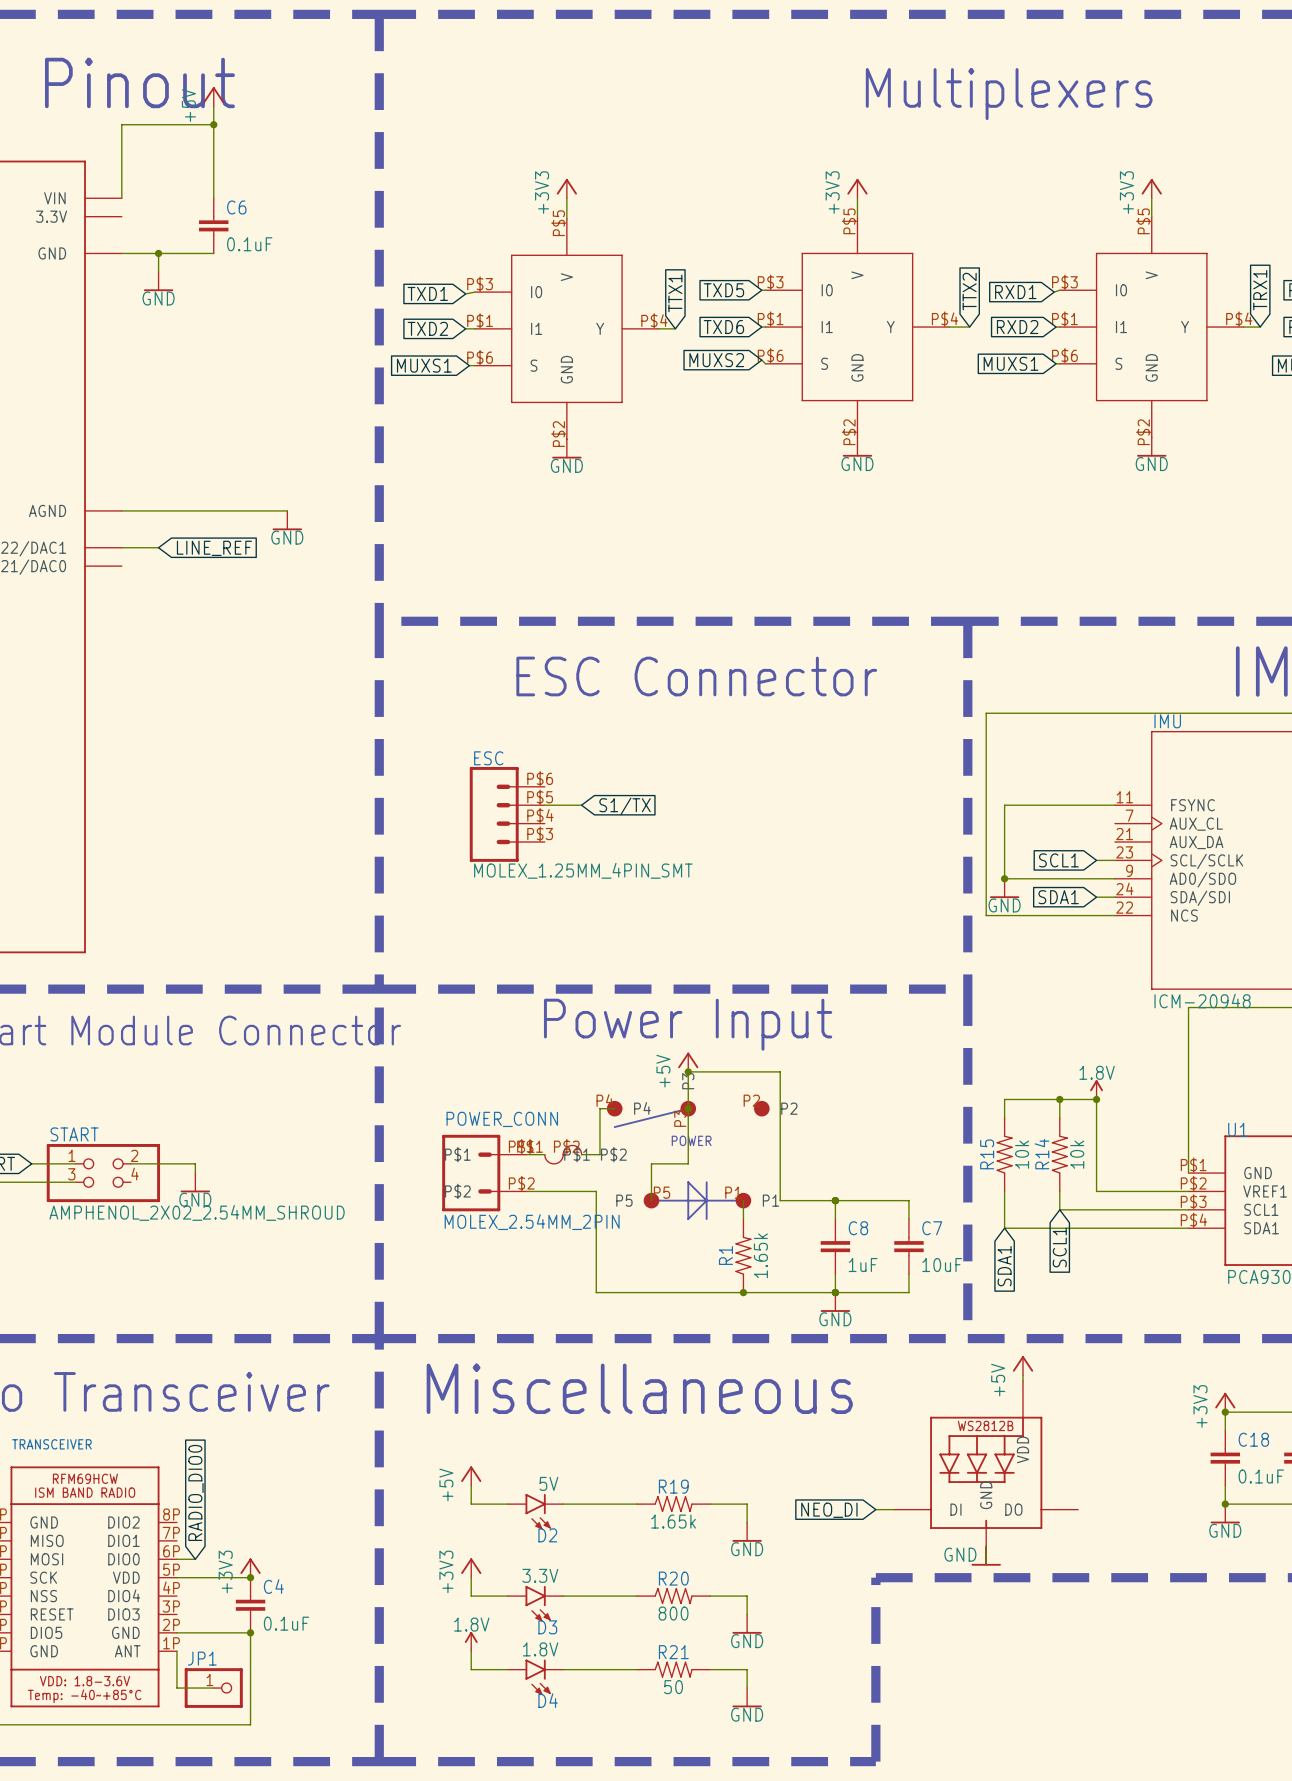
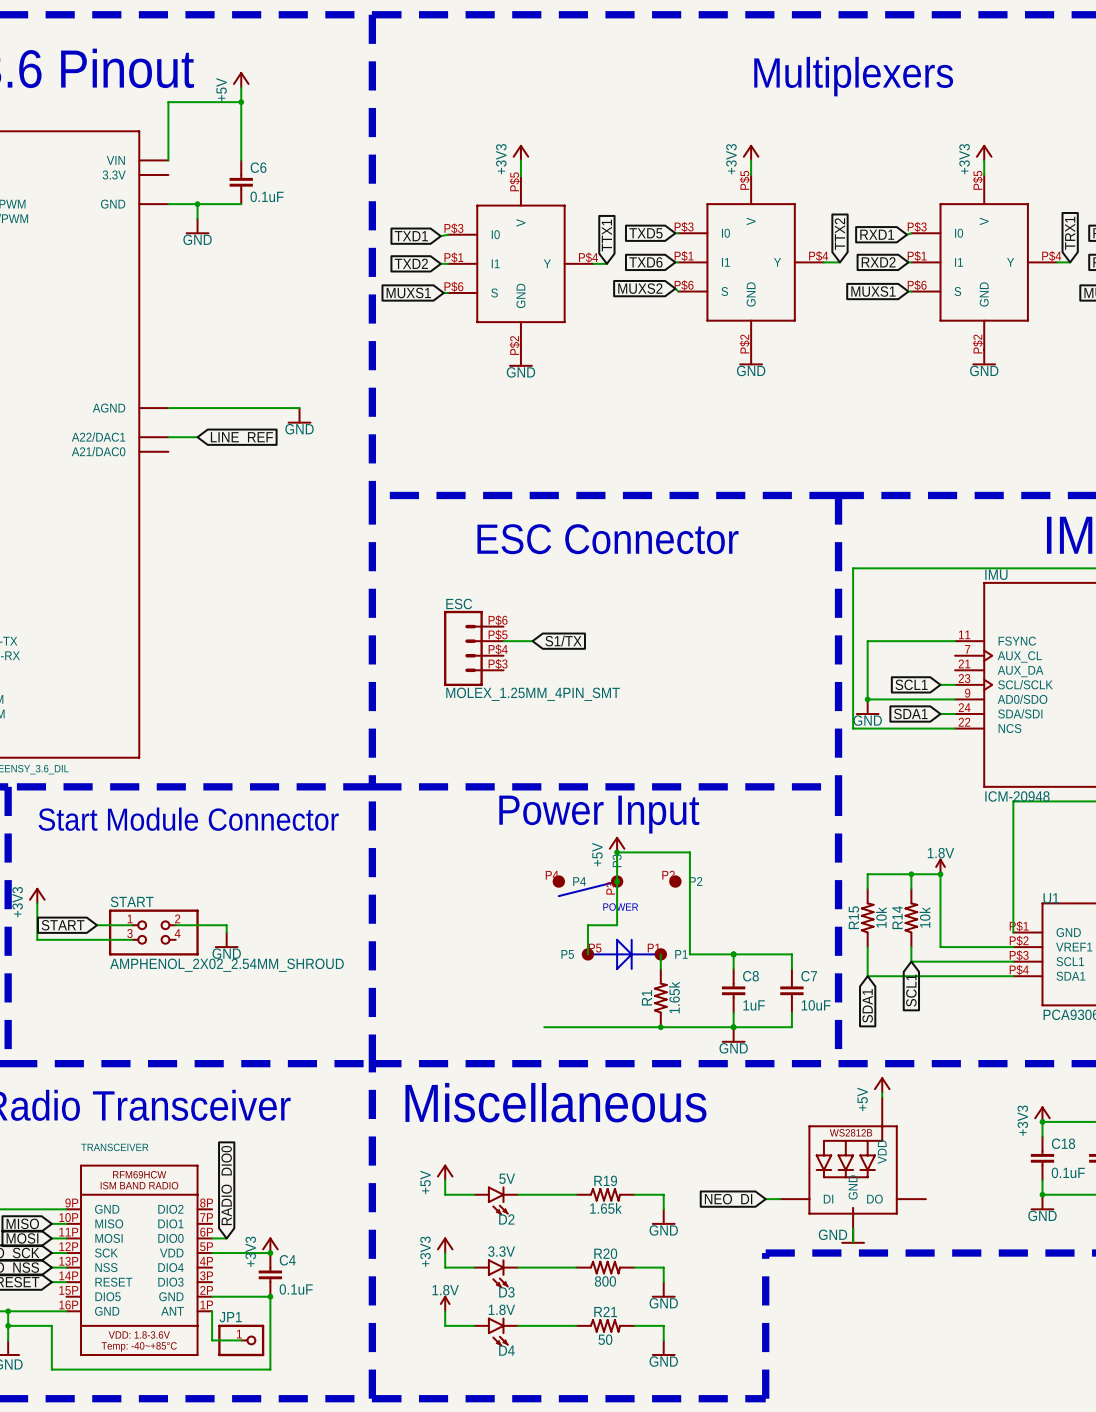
wire: (614, 1108) (599, 1108) (599, 1154) (581, 1154) -> none
wire: (526, 1154) (544, 1154) -> none
part: (563, 1154) -> none
POWER_CONN: MOLEX_2.54MM_2PIN (484, 1173) -> none
wire: (526, 1191) (596, 1191) (596, 1292) -> none

